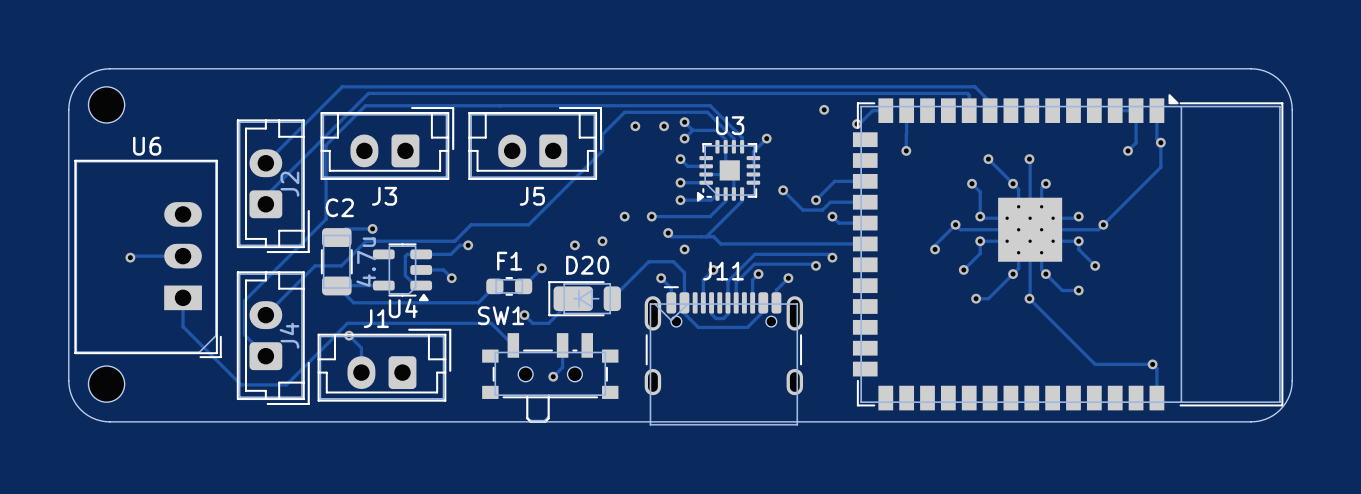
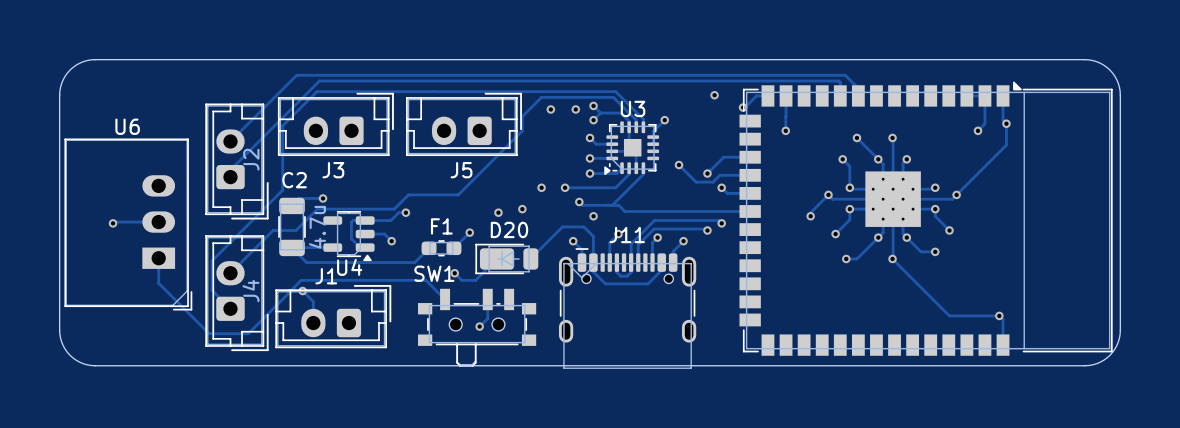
part: (106, 104) -> none
part: (106, 384) -> none

